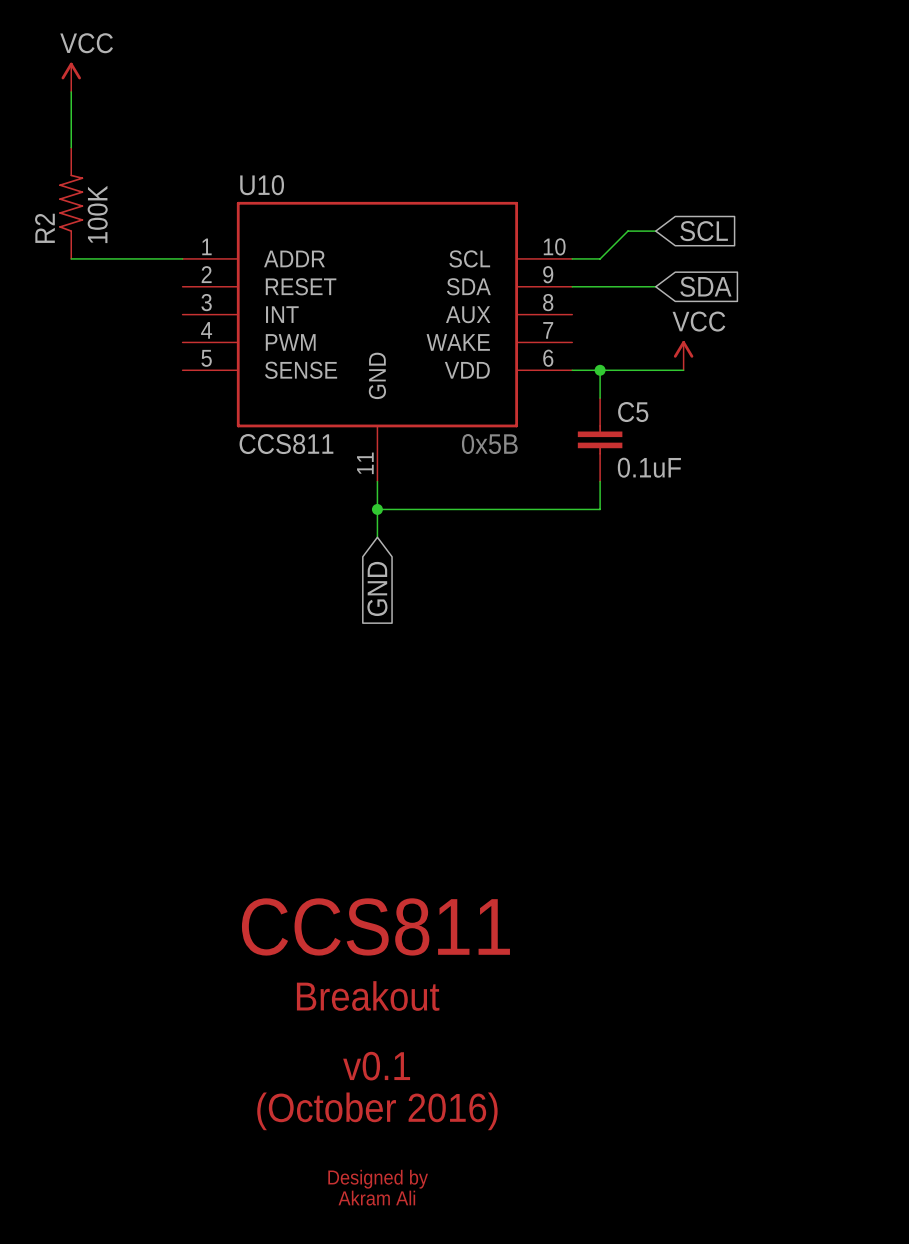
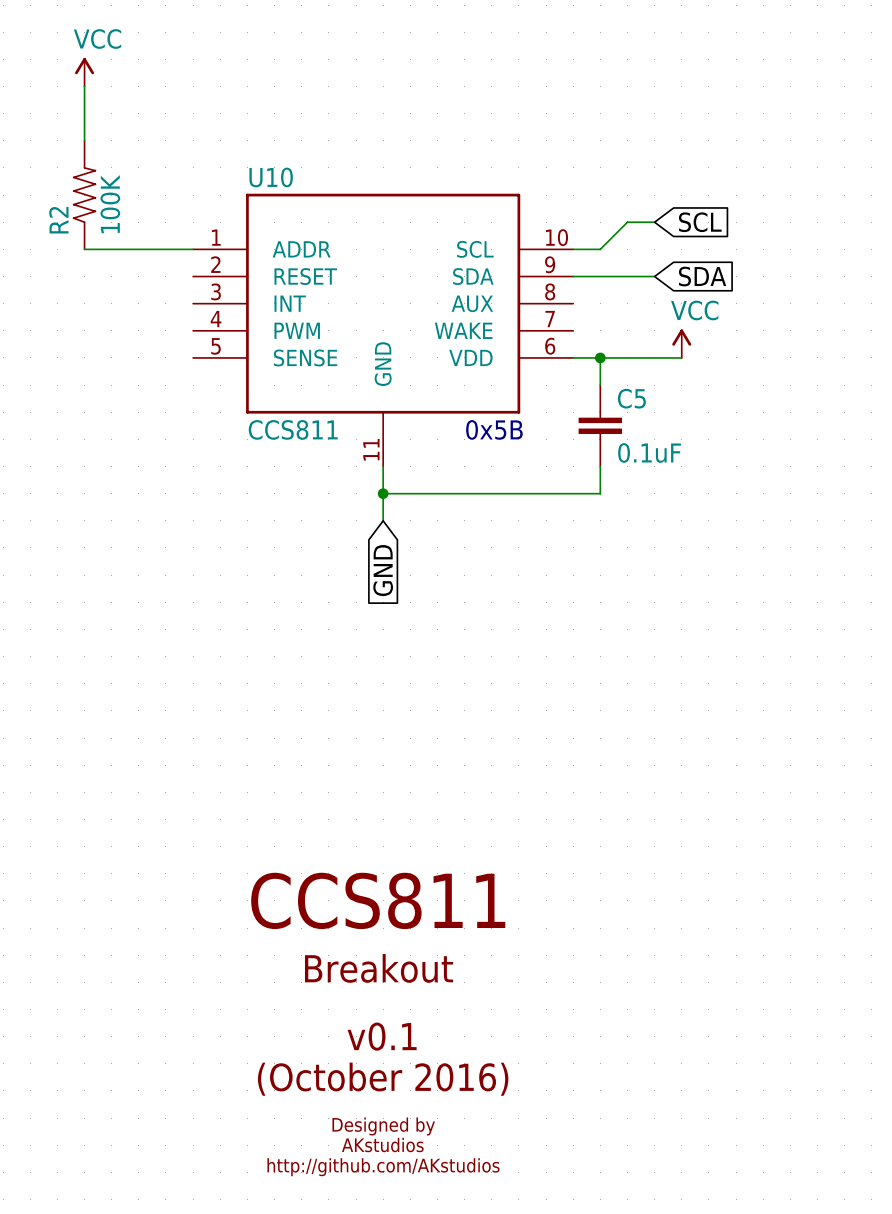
text: none -> Designed by (383, 1126)
text: Designed by (378, 1179) -> AKstudios (382, 1145)
text: Akram Ali (376, 1198) -> http://github.com/AKstudios (383, 1167)

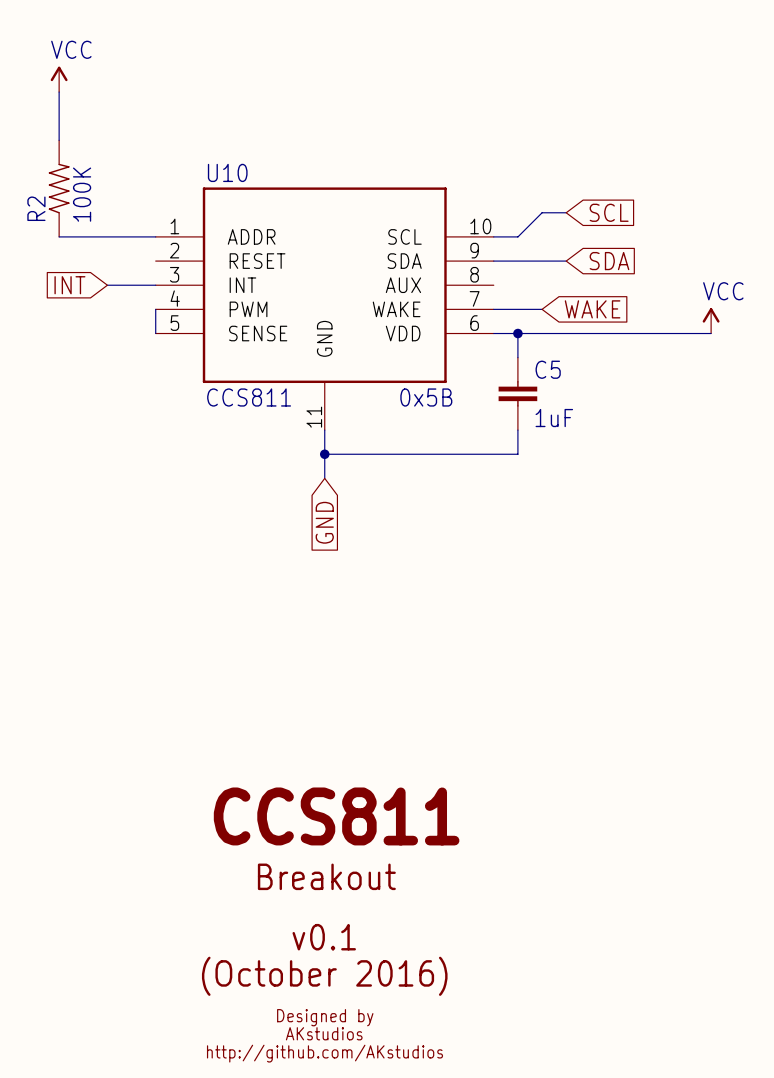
global label: none -> INT (69, 285)
wire: none -> (107, 285) (155, 285)
wire: none -> (155, 309) (155, 333)
wire: none -> (493, 309) (542, 309)
global label: none -> WAKE (592, 309)
power symbol position: VCC (681, 343) -> VCC (711, 320)
wire: none -> (590, 333) (711, 333)
C5 value: 0.1uF (649, 452) -> 1uF (554, 418)

